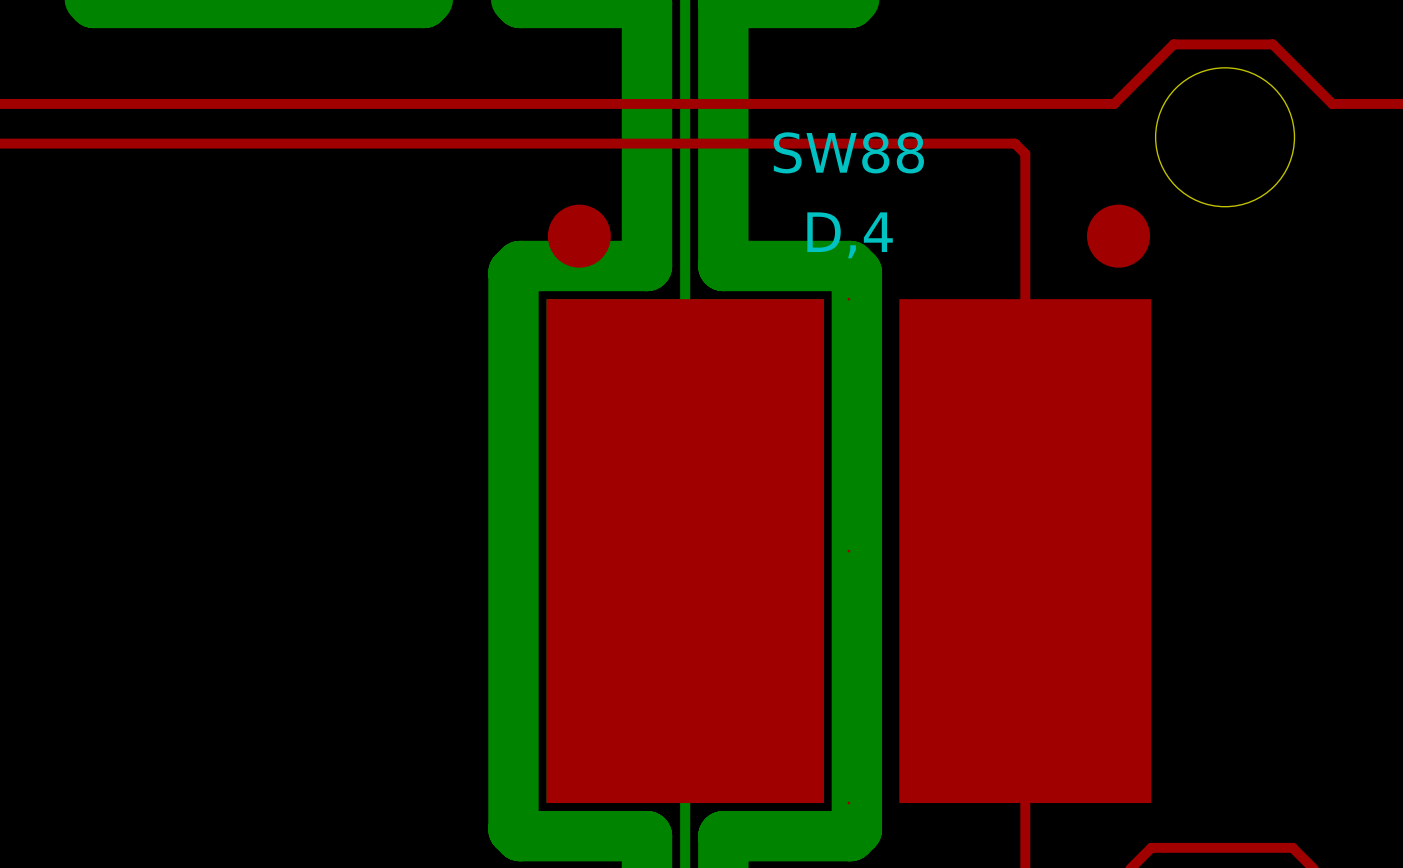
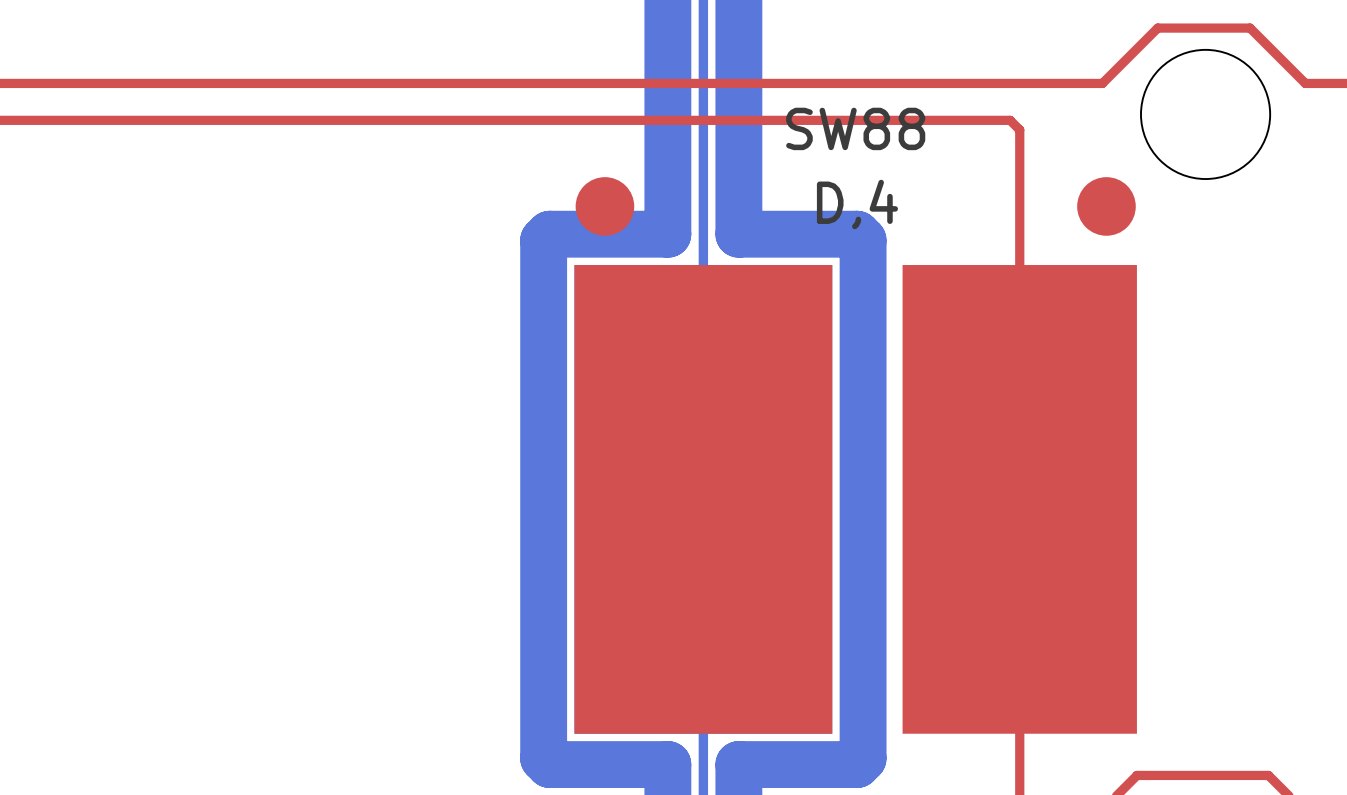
SW88 footprint: [546, 204, 1152, 805] -> [574, 177, 1137, 734]

